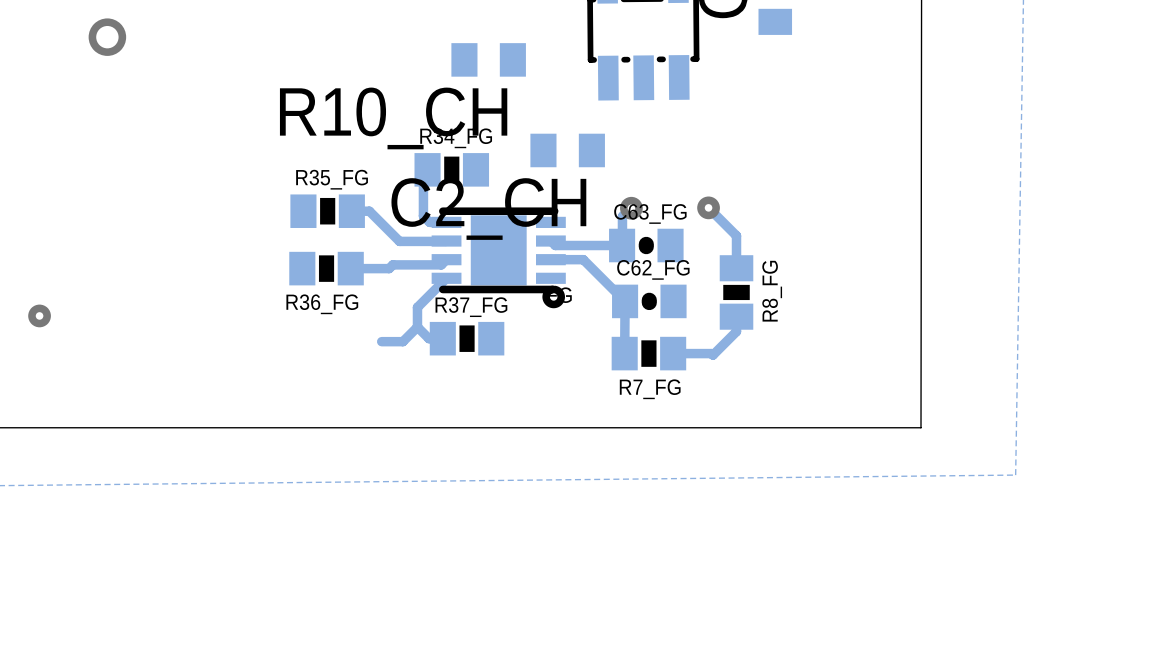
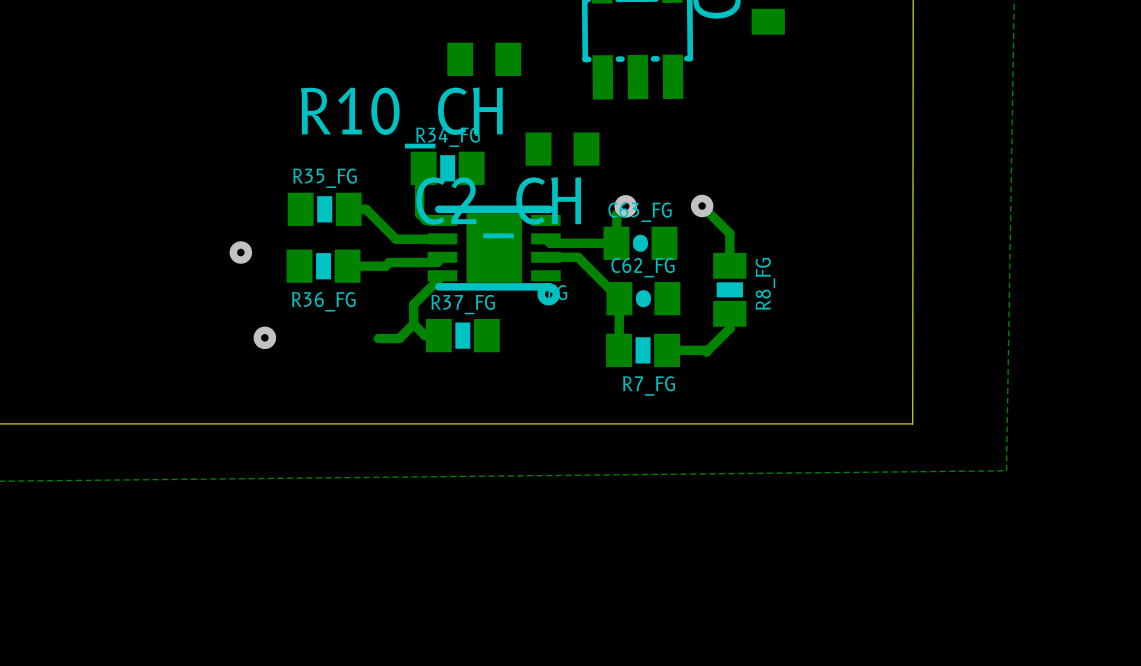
via: (107, 37) -> none
via: none -> (240, 252)
via: (39, 315) -> none
via: none -> (264, 337)

